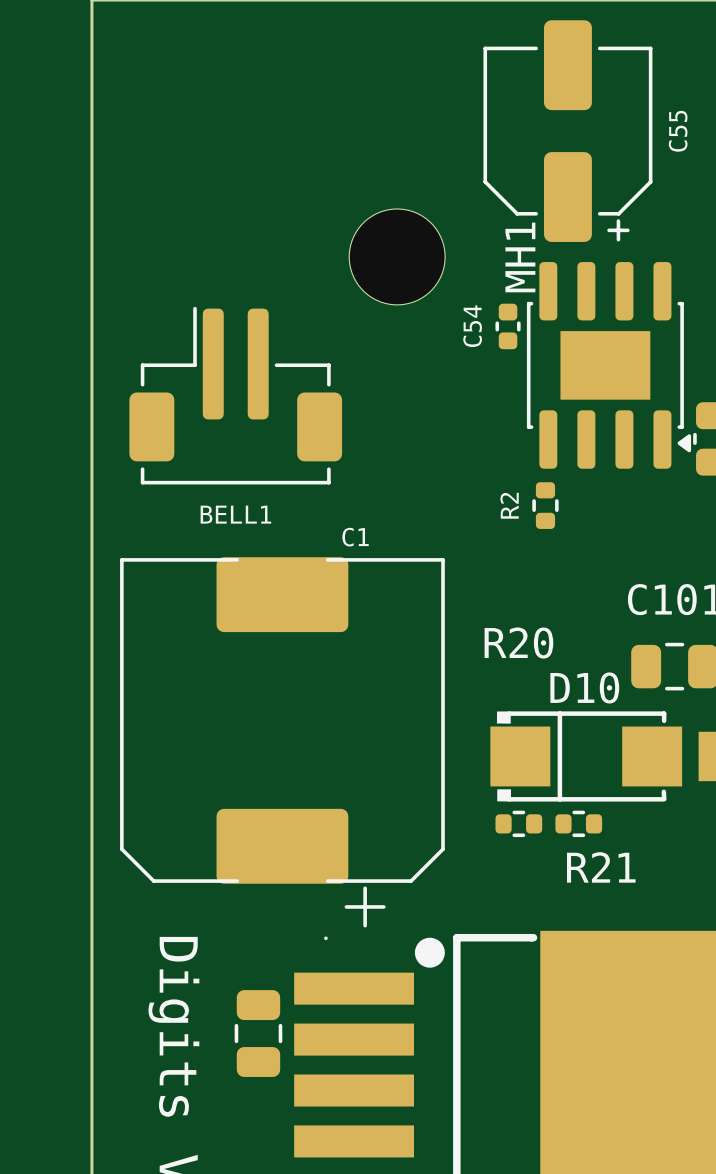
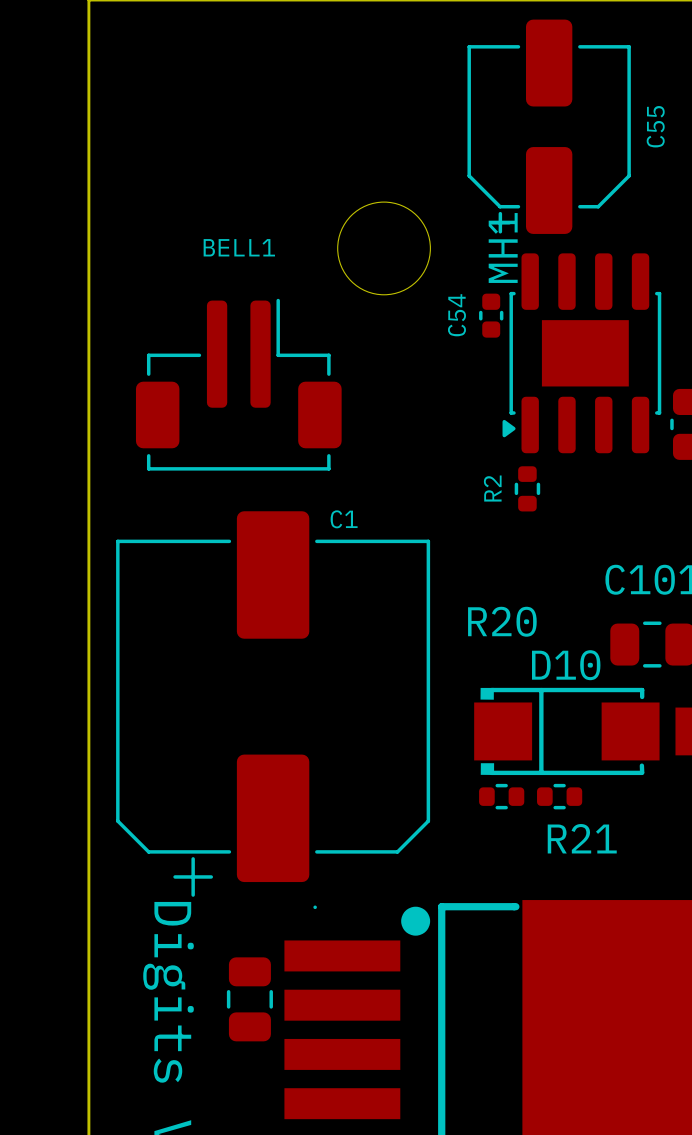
C55 footprint: [483, 20, 653, 242] -> [467, 19, 631, 234]
part footprint: [526, 262, 692, 469] -> [502, 253, 662, 454]
BELL1 footprint: [129, 306, 343, 485] -> [135, 298, 342, 471]
BELL1 name position: BELL1 (235, 514) -> BELL1 (239, 247)
C1 footprint: [120, 557, 445, 928] -> [116, 511, 431, 897]

